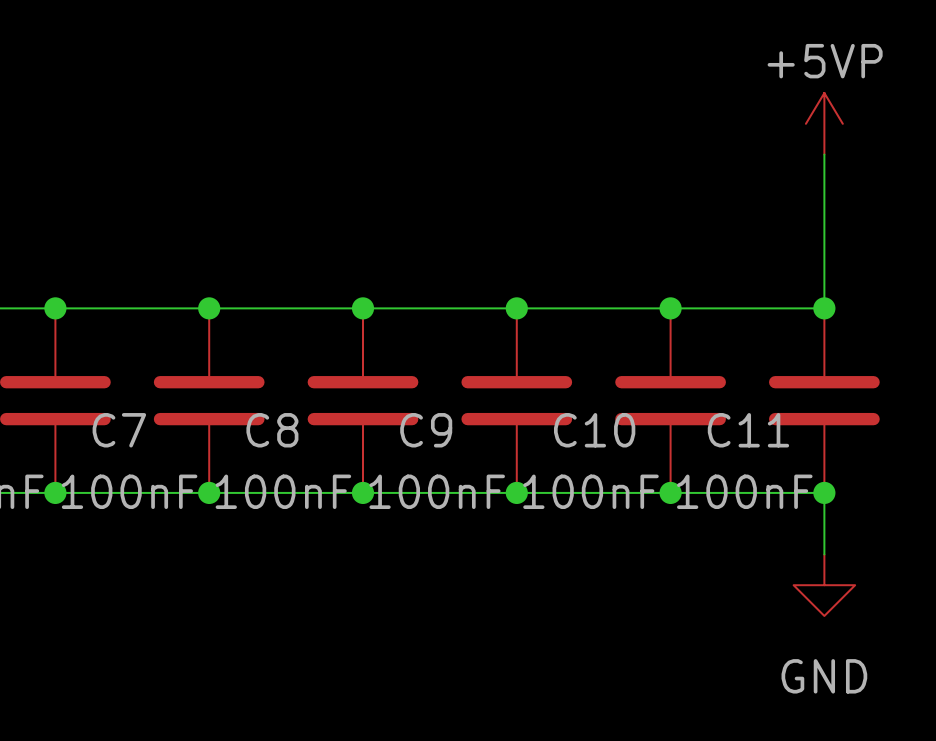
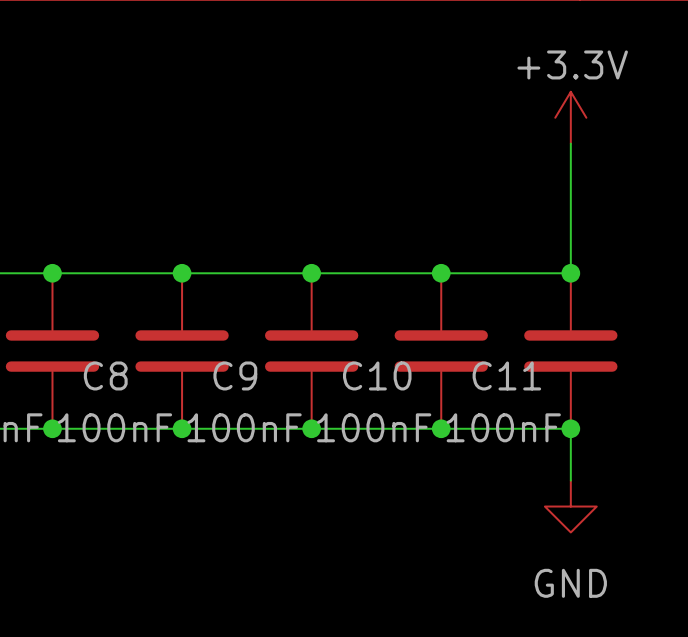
power symbol: +5VP (824, 123) -> +3.3V (570, 117)

